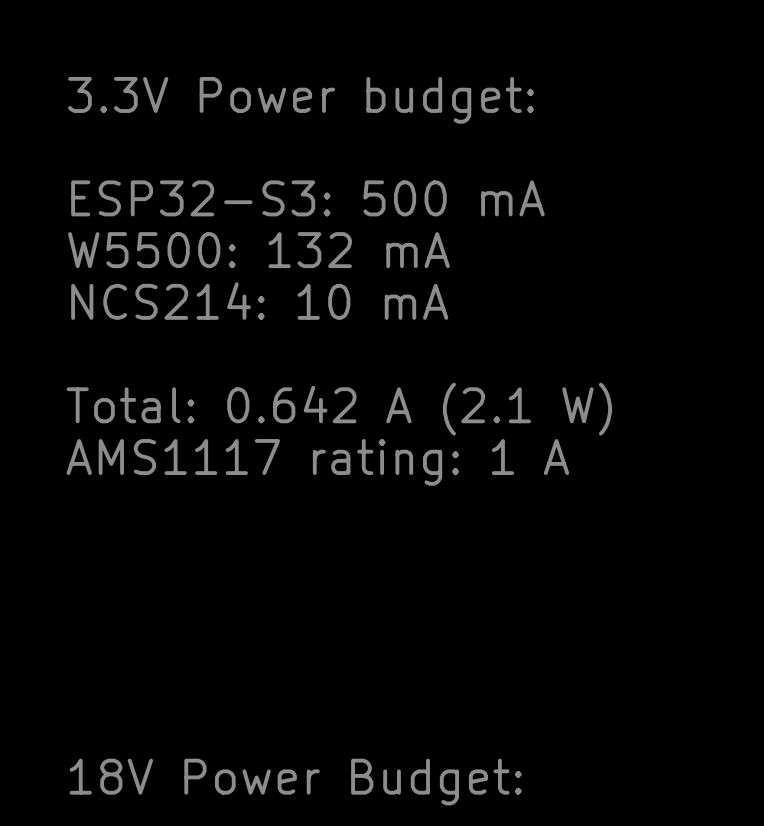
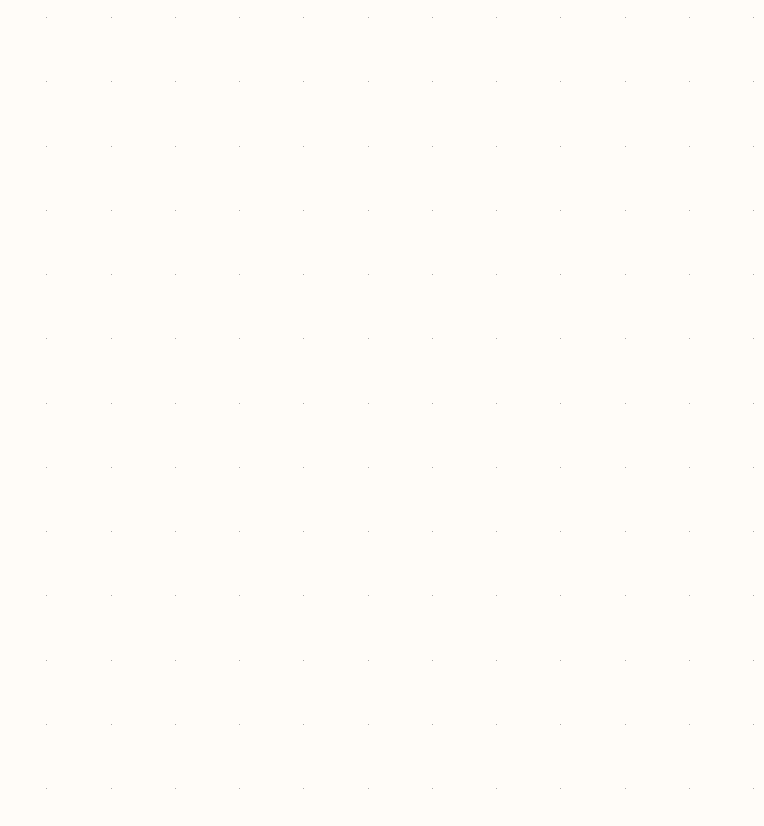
text: 3.3V Power budget: (301, 100) -> none
text: ESP32-S3: 500 mA (307, 198) -> none
text: W5500: 132 mA (258, 250) -> none
text: NCS214: 10 mA (259, 301) -> none
text: Total: 0.642 A (2.1 W) (339, 409) -> none
text: AMS1117 rating: 1 A (317, 462) -> none
text: 18V Power Budget: (295, 782) -> none

